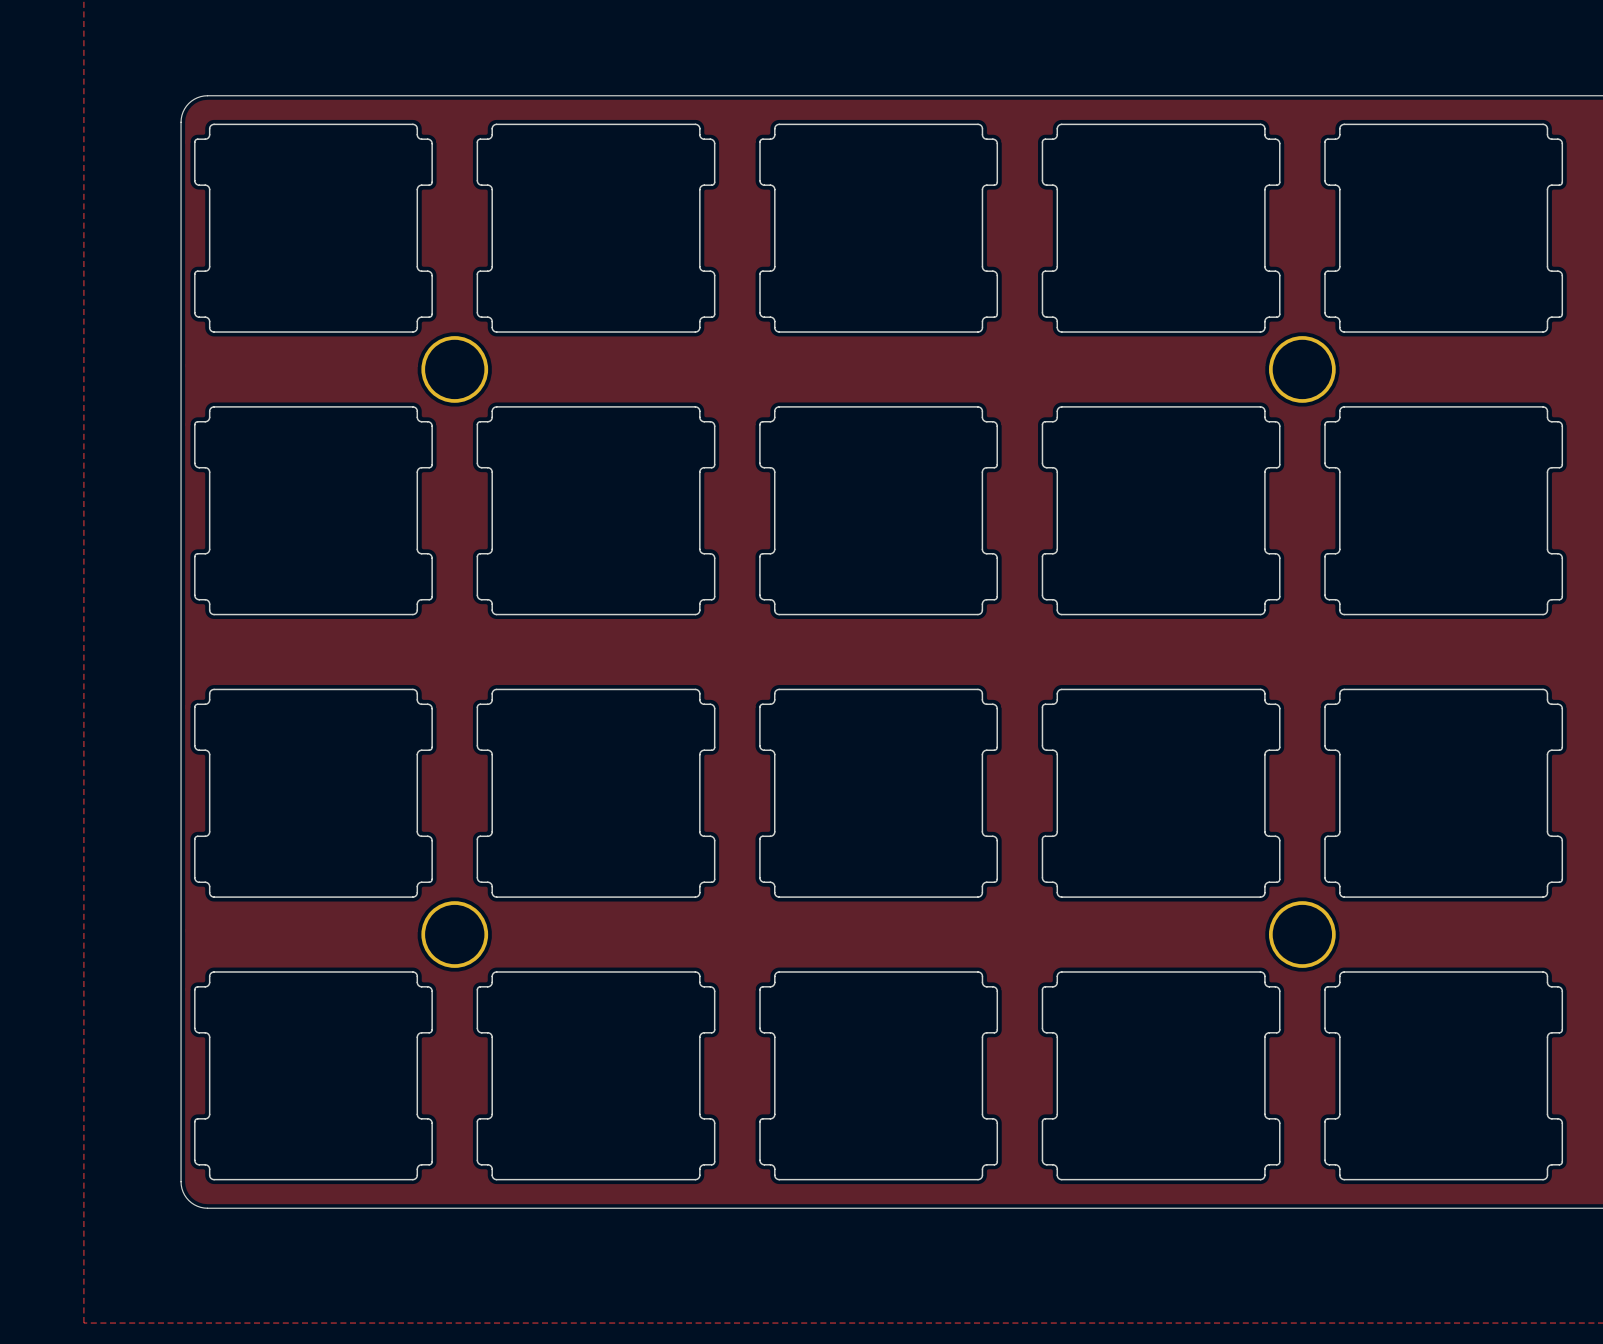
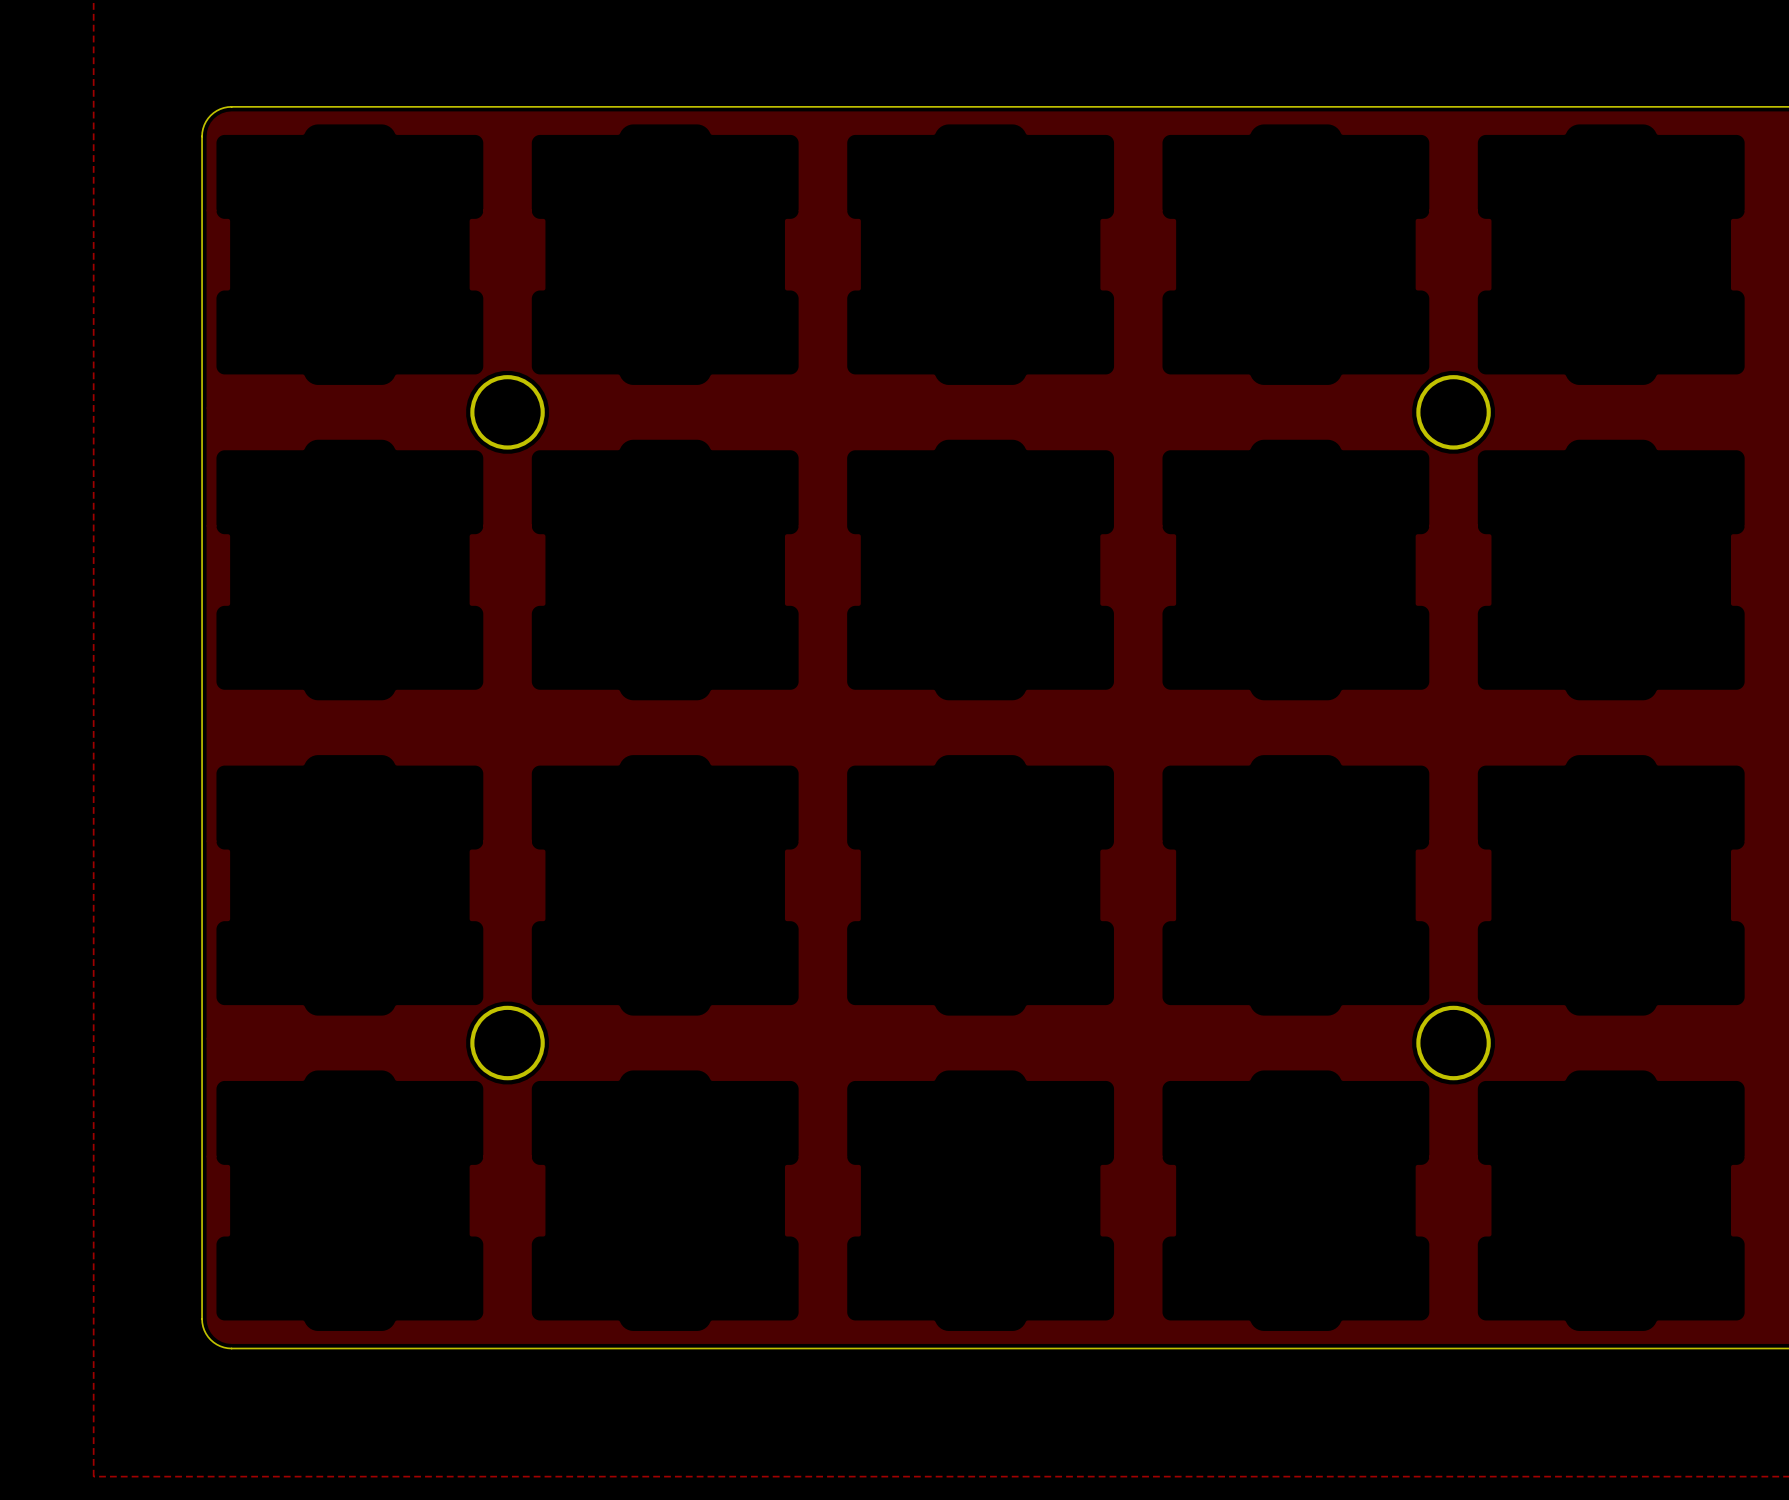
drawing: [194, 123, 433, 333] -> none
drawing: [476, 123, 716, 333] -> none
drawing: [759, 123, 999, 333] -> none
drawing: [1041, 123, 1281, 333] -> none
drawing: [1324, 123, 1564, 333] -> none
drawing: [194, 406, 433, 616] -> none
drawing: [476, 406, 716, 616] -> none
drawing: [759, 406, 998, 616] -> none
drawing: [1041, 406, 1281, 616] -> none
drawing: [1324, 406, 1564, 616] -> none
drawing: [194, 688, 433, 898] -> none
drawing: [476, 688, 716, 898] -> none
drawing: [759, 688, 998, 898] -> none
drawing: [1041, 688, 1281, 898] -> none
drawing: [1324, 688, 1564, 898] -> none
drawing: [194, 971, 433, 1181] -> none
drawing: [476, 971, 716, 1181] -> none
drawing: [759, 971, 999, 1181] -> none
drawing: [1041, 971, 1281, 1181] -> none
drawing: [1324, 971, 1564, 1181] -> none

